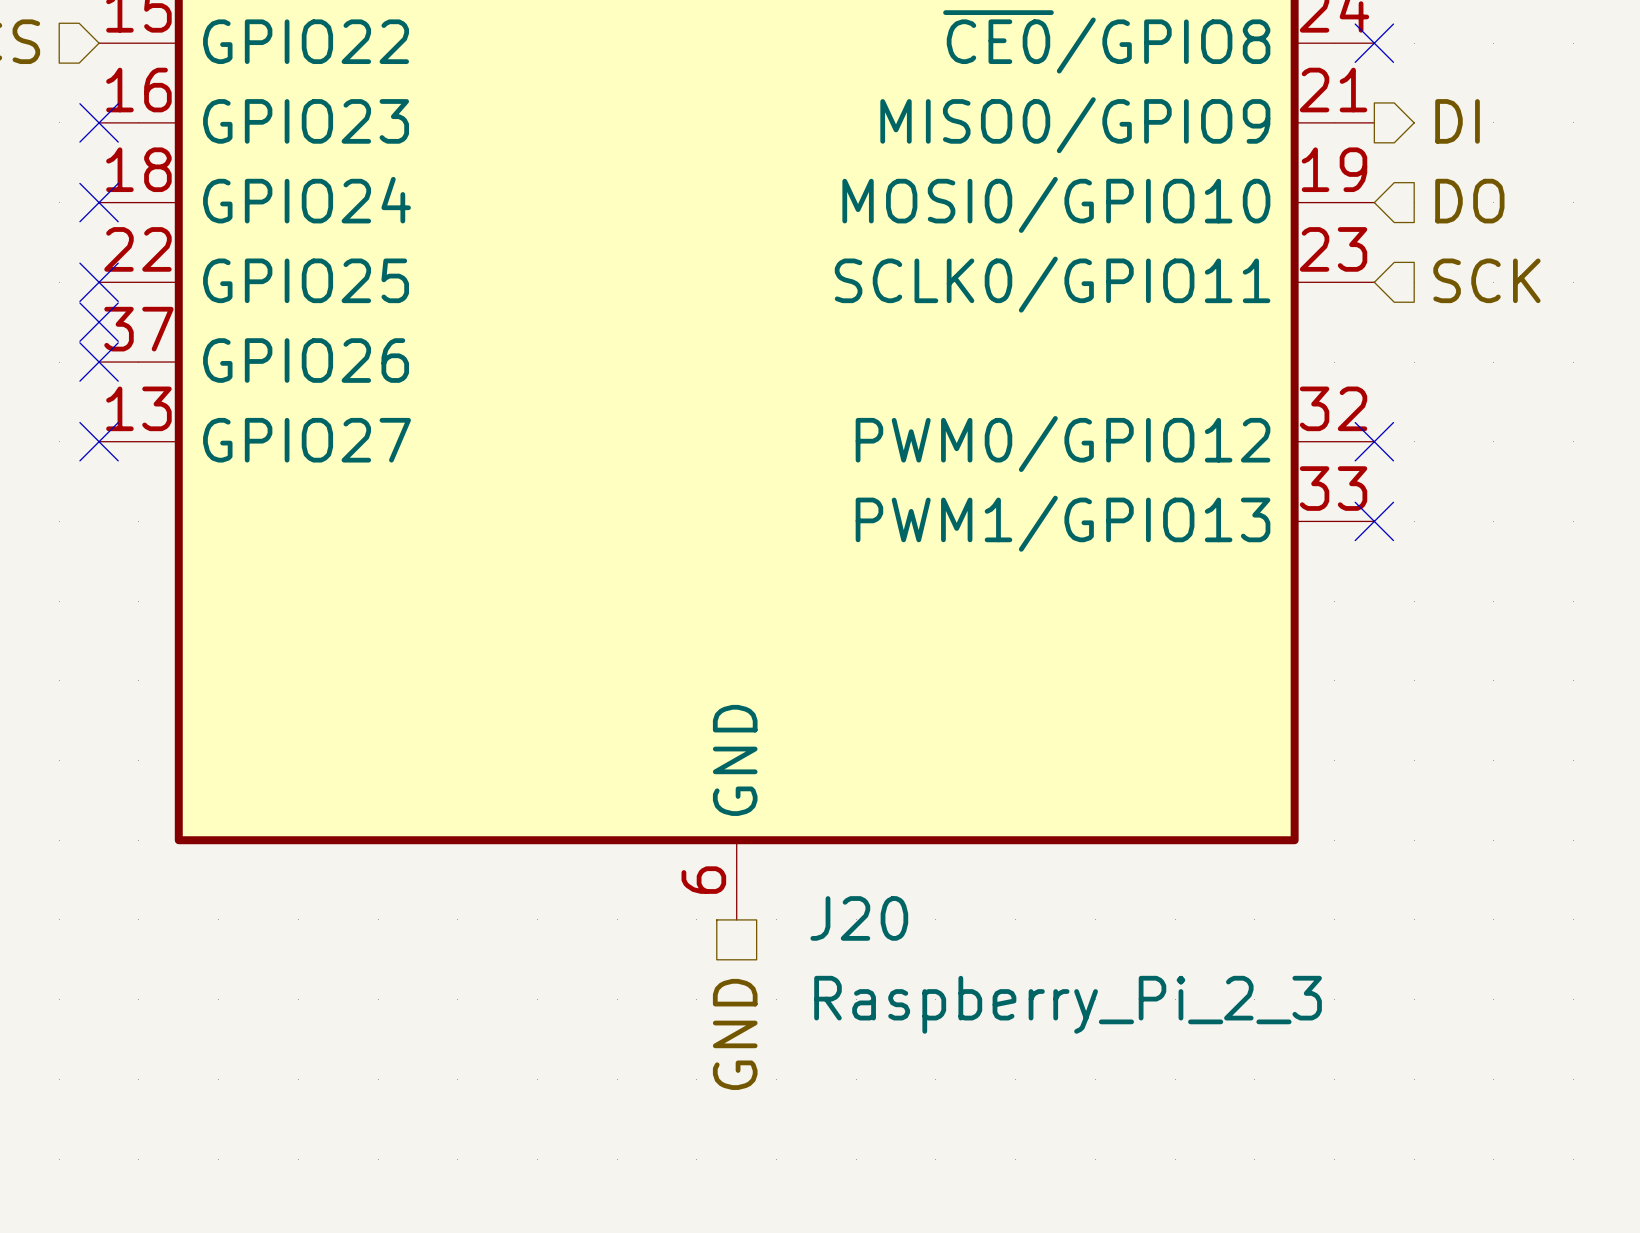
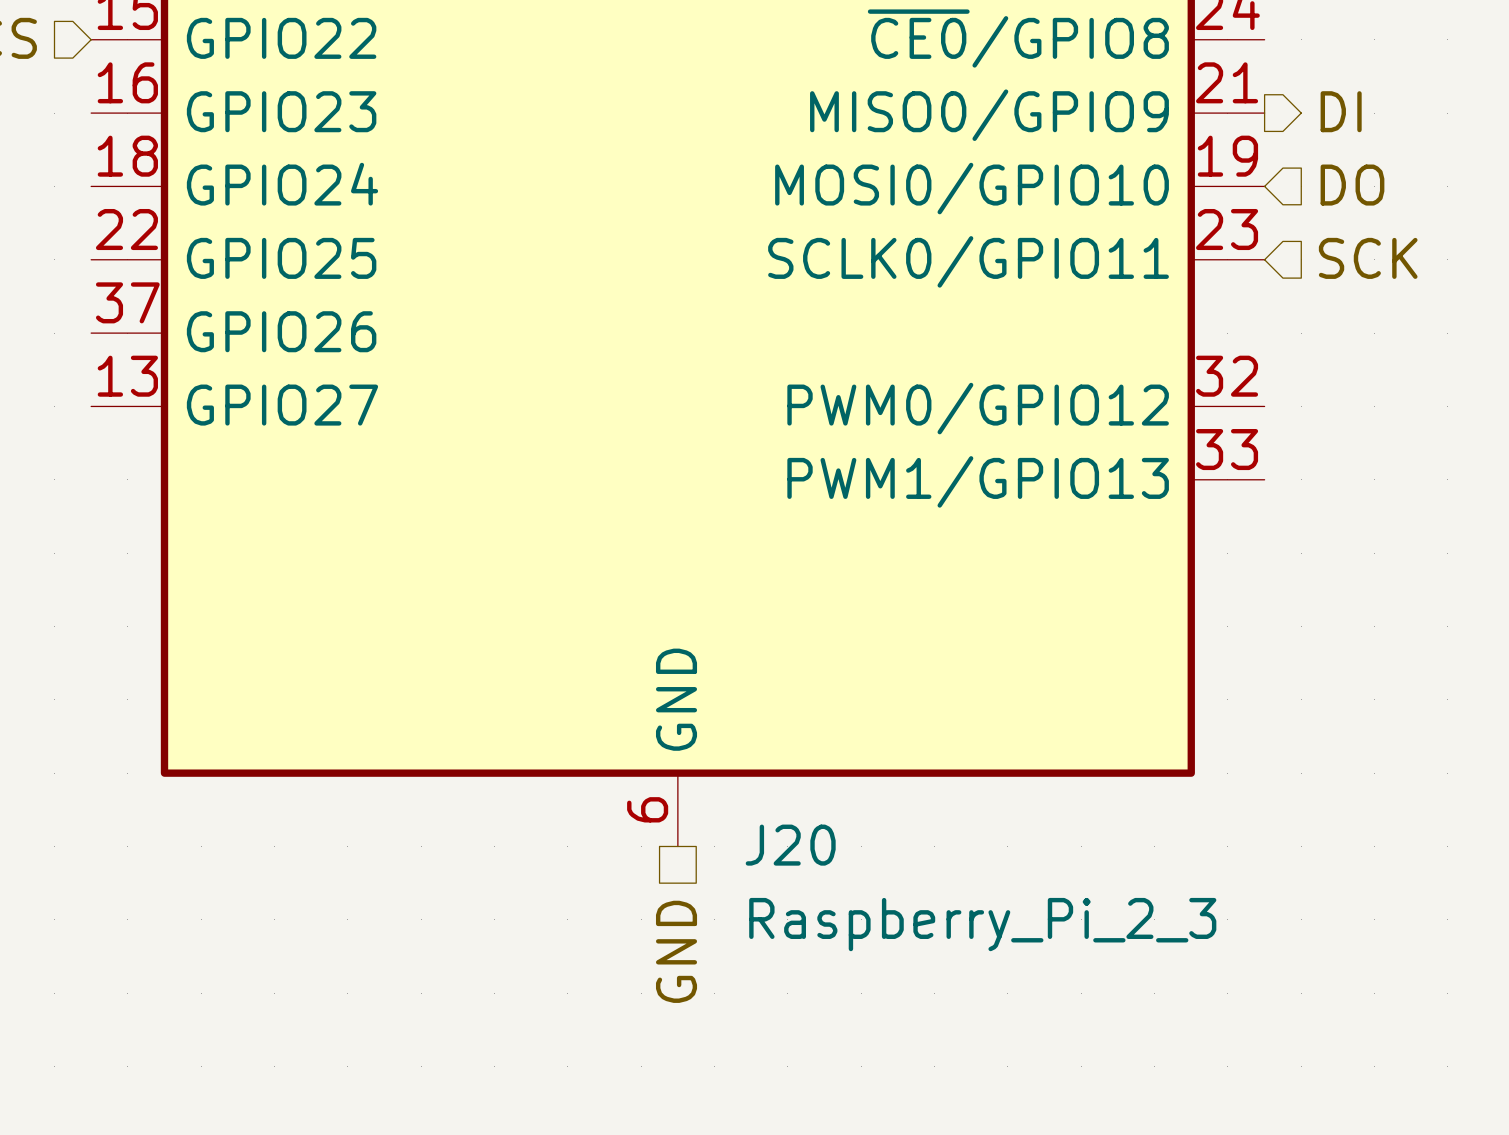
no-connect mark: (1374, 43) -> none
no-connect mark: (99, 122) -> none
no-connect mark: (99, 202) -> none
no-connect mark: (99, 282) -> none
no-connect mark: (99, 322) -> none
no-connect mark: (99, 362) -> none
no-connect mark: (99, 441) -> none
no-connect mark: (1374, 441) -> none
no-connect mark: (1374, 521) -> none

